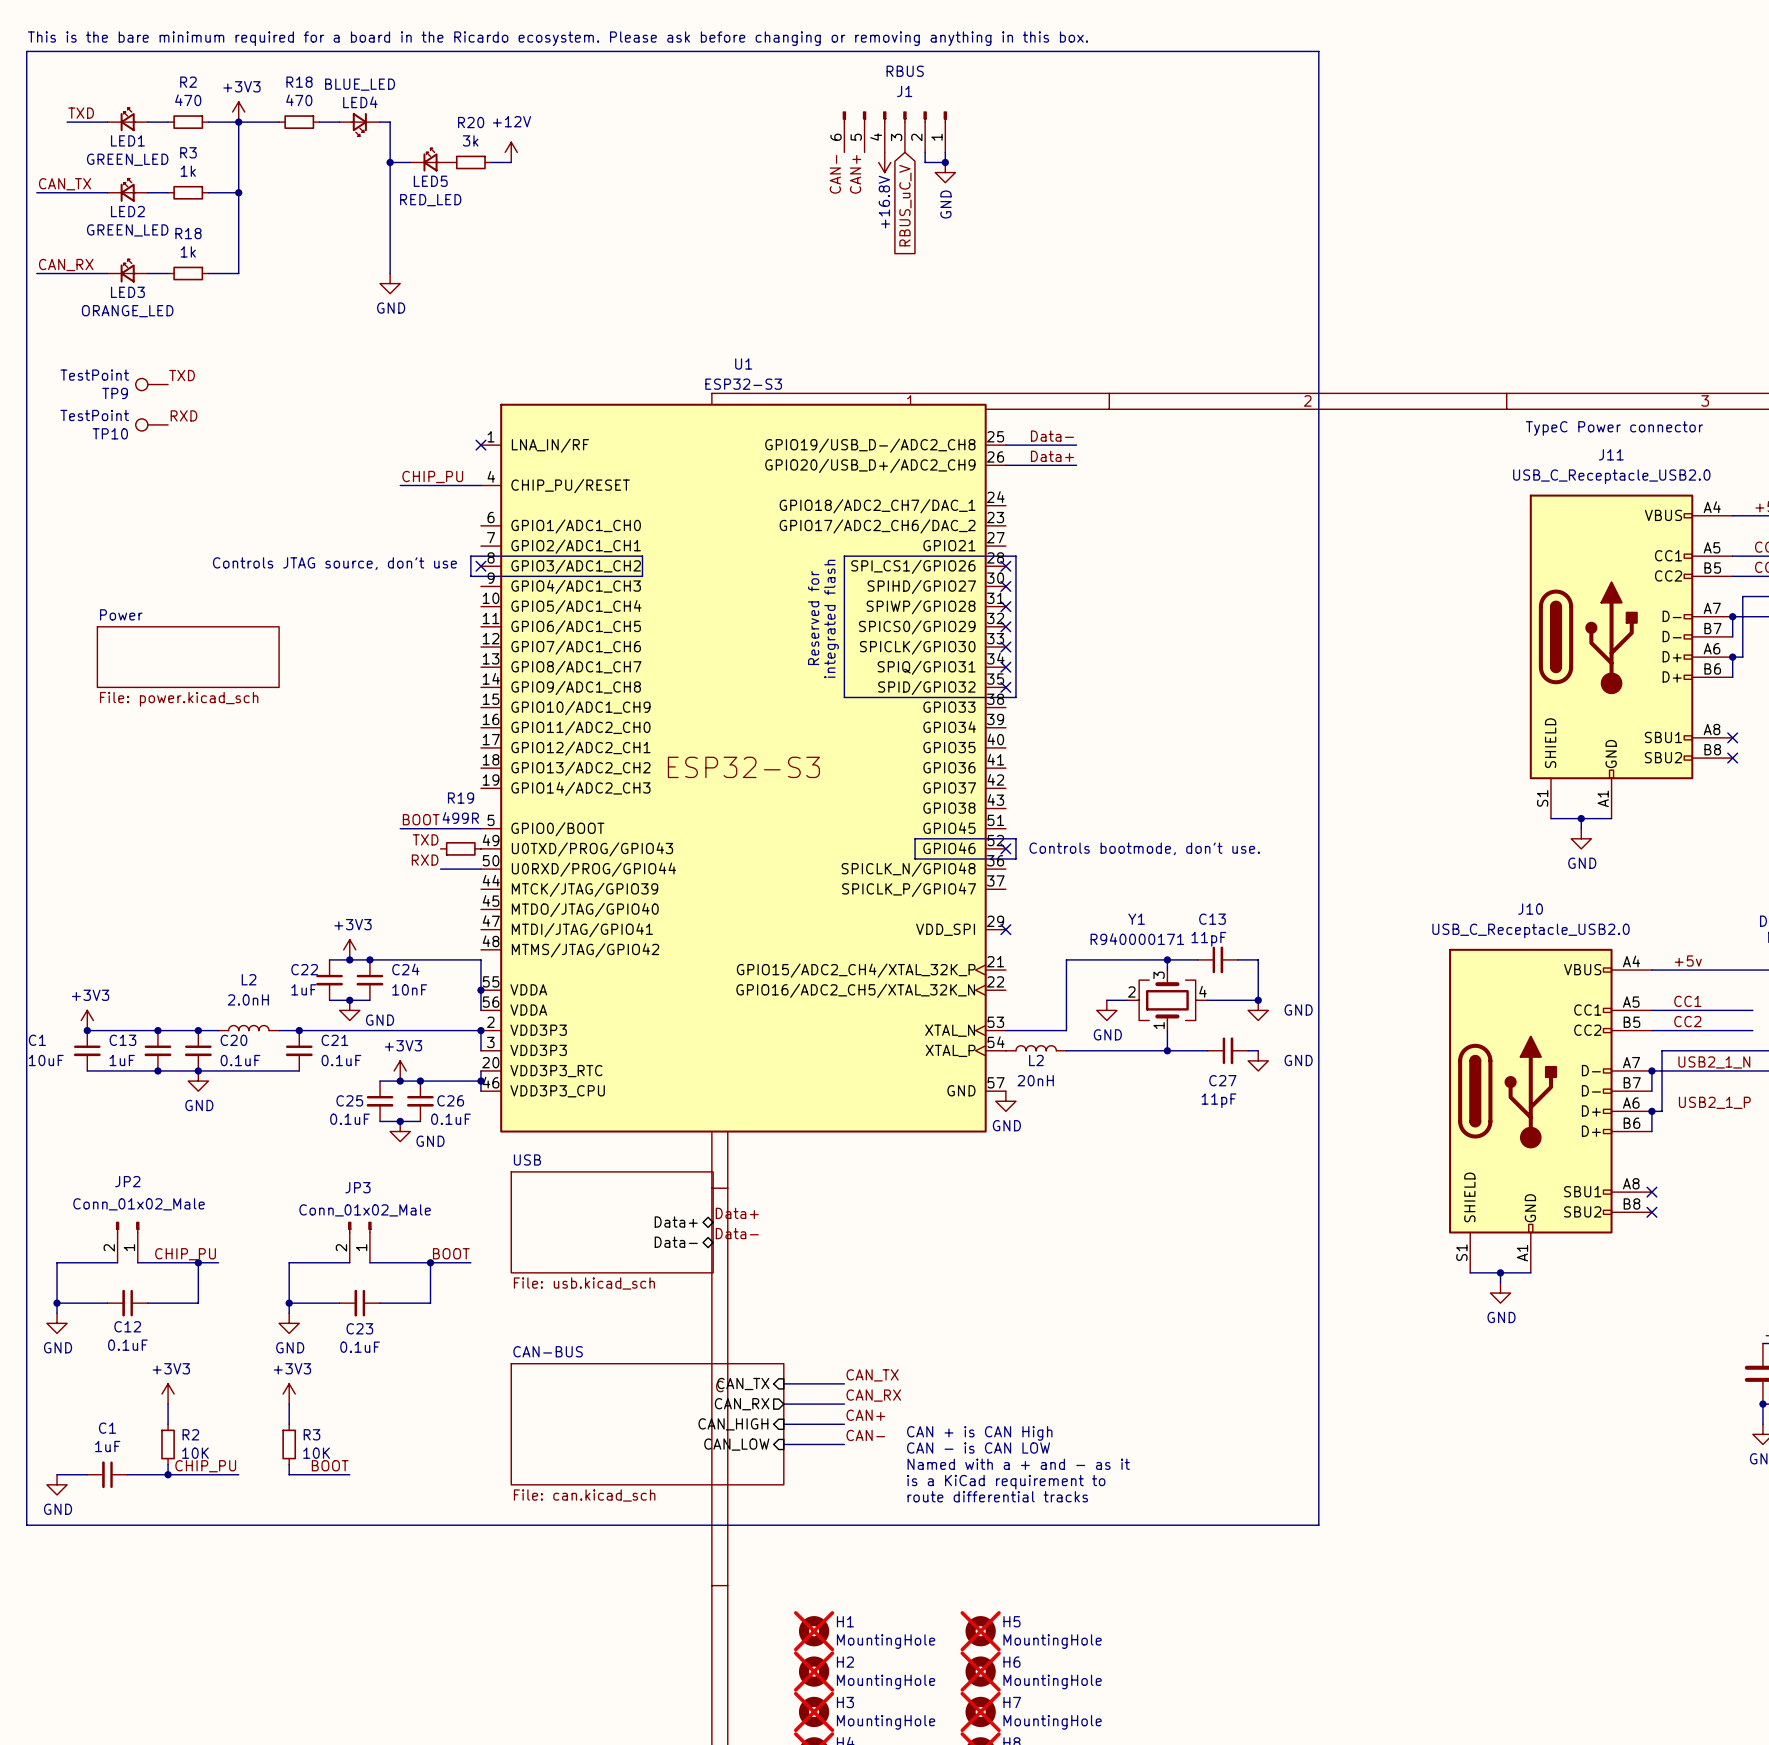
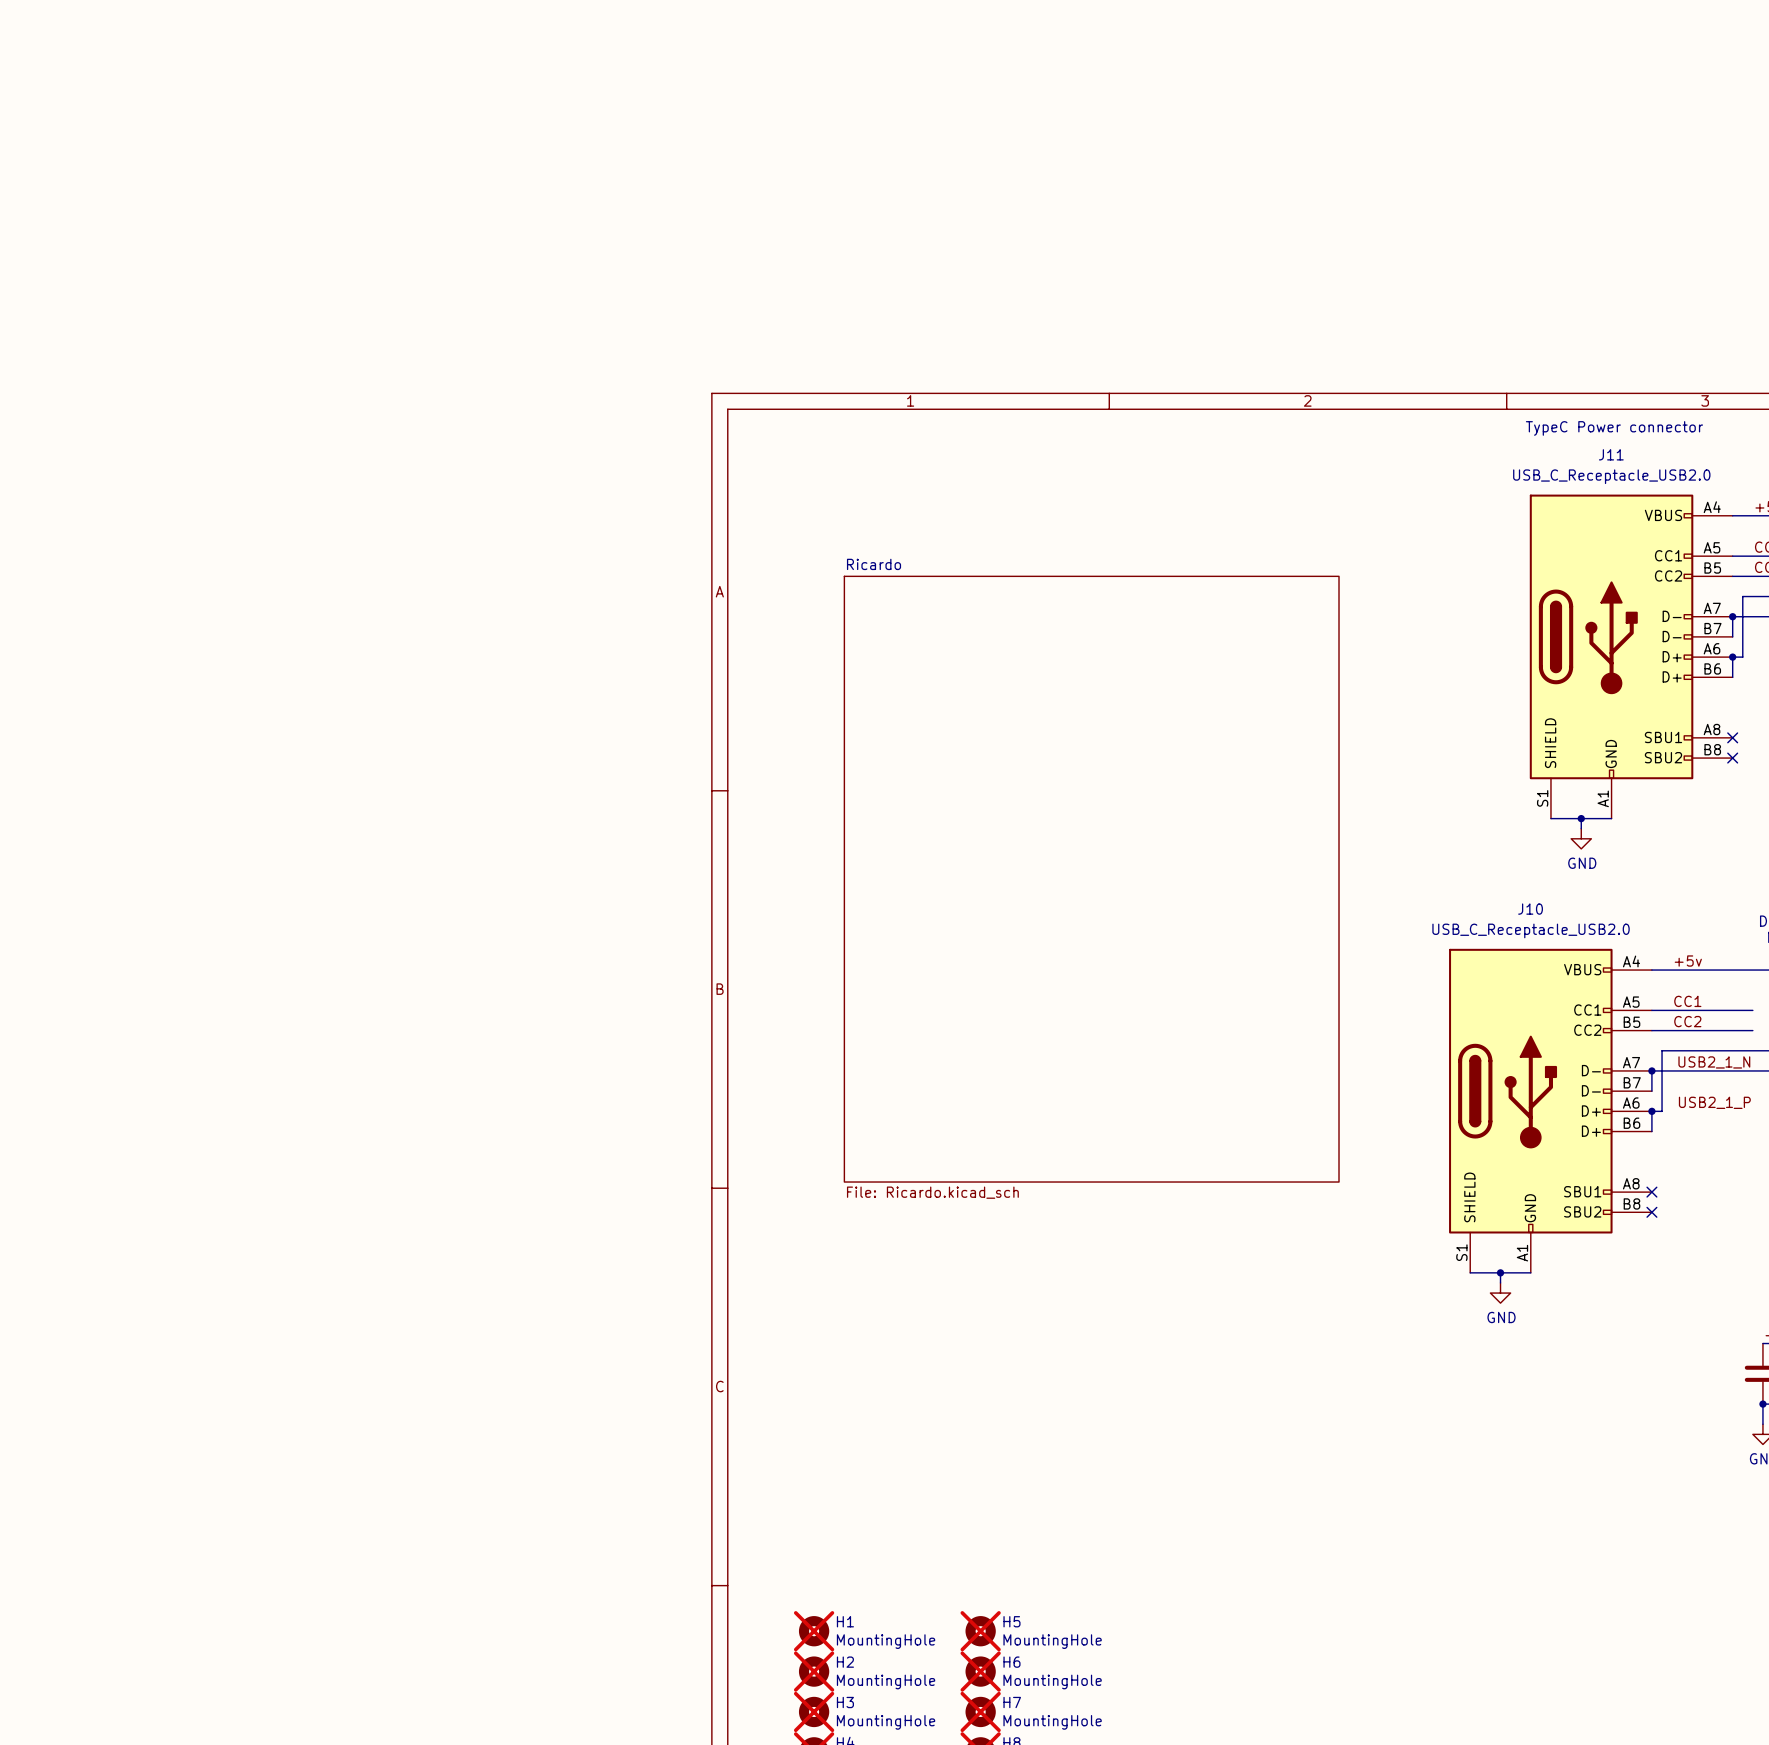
text: This is the bare minimum required for a board in the Ricardo ecosystem. Please ask before changing or removing anything in this box. (557, 38) -> none
line: (26, 51) (1318, 51) (1318, 1525) (26, 1525) (26, 51) -> none
power symbol: +3V3 (238, 112) -> none
label: TXD (81, 113) -> none
LED1: GREEN_LED (127, 119) -> none
wire: (67, 122) (107, 122) -> none
wire: (147, 122) (168, 122) -> none
R2: 470 (188, 122) -> none
wire: (208, 122) (279, 122) -> none
wire: (238, 122) (238, 273) (208, 273) -> none
junction: (238, 122) -> none
R18: 470 (299, 122) -> none
wire: (319, 122) (339, 122) -> none
wire: (380, 122) (390, 122) (390, 273) -> none
LED4: BLUE_LED (359, 124) -> none
J1: RBUS (894, 131) -> none
power symbol: +12V (511, 152) -> none
wire: (925, 152) (925, 162) (945, 162) (945, 152) -> none
LED5: RED_LED (430, 159) -> none
wire: (390, 162) (410, 162) -> none
junction: (390, 162) -> none
R20: 3k (470, 162) -> none
wire: (491, 162) (511, 162) -> none
power symbol: +16.8V (884, 162) -> none
junction: (945, 162) -> none
power symbol: GND (945, 172) -> none
label: CAN- (835, 174) -> none
label: CAN+ (855, 174) -> none
label: CAN_TX (65, 184) -> none
LED2: GREEN_LED (127, 190) -> none
wire: (36, 192) (107, 192) -> none
wire: (147, 192) (168, 192) -> none
R3: 1k (188, 192) -> none
wire: (208, 192) (238, 192) -> none
junction: (238, 192) -> none
global label: RBUS_uC_V (905, 205) -> none
label: CAN_RX (66, 264) -> none
LED3: ORANGE_LED (127, 270) -> none
wire: (36, 273) (107, 273) -> none
wire: (147, 273) (168, 273) -> none
R18: 1k (188, 273) -> none
power symbol: GND (390, 283) -> none
label: TXD (182, 375) -> none
TP9: TestPoint (151, 384) -> none
label: RXD (183, 415) -> none
TP10: TestPoint (151, 424) -> none
label: Data- (1052, 436) -> none
no-connect mark: (480, 445) -> none
wire: (1005, 445) (1076, 445) -> none
label: Data+ (1052, 456) -> none
wire: (1005, 465) (1076, 465) -> none
label: CHIP_PU (432, 476) -> none
wire: (400, 485) (480, 485) -> none
line: (470, 556) (642, 556) (642, 576) (470, 576) (470, 556) -> none
line: (844, 556) (1015, 556) (1015, 697) (844, 697) (844, 556) -> none
text: Controls JTAG source, don't use (334, 563) -> none
no-connect mark: (480, 566) -> none
no-connect mark: (1005, 566) -> none
no-connect mark: (1005, 586) -> none
no-connect mark: (1005, 606) -> none
text: Reserved for (813, 618) -> none
text: integrated flash (831, 619) -> none
no-connect mark: (1005, 626) -> none
no-connect mark: (1005, 647) -> none
sheet Power: File: power.kicad_sch (188, 657) -> none
no-connect mark: (1005, 667) -> none
no-connect mark: (1005, 687) -> none
U1: ESP32-S3 (743, 768) -> none
label: BOOT (421, 819) -> none
wire: (400, 828) (480, 828) -> none
line: (915, 838) (915, 858) (1015, 858) (1015, 838) (915, 838) -> none
label: TXD (425, 839) -> none
R19: 499R (460, 848) -> none
no-connect mark: (1005, 848) -> none
text: Controls bootmode, don't use. (1144, 848) -> none
label: RXD (425, 860) -> none
wire: (440, 869) (480, 869) -> none
sheet Ricardo: none -> File: Ricardo.kicad_sch (1091, 879)
no-connect mark: (1005, 929) -> none
power symbol: +3V3 (349, 949) -> none
wire: (329, 959) (480, 959) (480, 1010) -> none
junction: (349, 959) -> none
junction: (369, 959) -> none
wire: (1167, 959) (1167, 970) -> none
junction: (1167, 959) -> none
wire: (1197, 959) (1066, 959) (1066, 1030) (1005, 1030) -> none
C13: 11pF (1217, 959) -> none
wire: (1238, 959) (1258, 959) (1258, 1000) (1207, 1000) -> none
C22: 1uF (329, 980) -> none
C24: 10nF (369, 980) -> none
junction: (480, 990) -> none
wire: (329, 1000) (369, 1000) -> none
junction: (349, 1000) -> none
wire: (1106, 1000) (1127, 1000) -> none
Y1: R940000171 (1167, 1000) -> none
junction: (1258, 1000) -> none
power symbol: GND (349, 1010) -> none
power symbol: GND (1106, 1010) -> none
power symbol: GND (1258, 1010) -> none
power symbol: +3V3 (87, 1020) -> none
L2: 2.0nH (248, 1028) -> none
wire: (87, 1030) (218, 1030) -> none
junction: (87, 1030) -> none
junction: (157, 1030) -> none
junction: (198, 1030) -> none
wire: (279, 1030) (480, 1030) (480, 1050) -> none
junction: (299, 1030) -> none
junction: (480, 1030) -> none
wire: (1167, 1030) (1167, 1050) -> none
L2: 20nH (1036, 1048) -> none
C1: 10uF (87, 1050) -> none
C13: 1uF (157, 1050) -> none
C20: 0.1uF (198, 1050) -> none
C21: 0.1uF (299, 1050) -> none
wire: (1066, 1050) (1207, 1050) -> none
junction: (1167, 1050) -> none
C27: 11pF (1227, 1050) -> none
wire: (1248, 1050) (1258, 1050) -> none
power symbol: GND (1258, 1060) -> none
wire: (87, 1070) (299, 1070) -> none
junction: (157, 1070) -> none
junction: (198, 1070) -> none
power symbol: +3V3 (400, 1070) -> none
wire: (480, 1070) (480, 1091) -> none
power symbol: GND (198, 1081) -> none
wire: (380, 1081) (480, 1081) -> none
junction: (400, 1081) -> none
junction: (420, 1081) -> none
junction: (480, 1081) -> none
C25: 0.1uF (380, 1101) -> none
C26: 0.1uF (420, 1101) -> none
power symbol: GND (1005, 1101) -> none
wire: (380, 1121) (420, 1121) -> none
junction: (400, 1121) -> none
power symbol: GND (400, 1131) -> none
label: Data+ (737, 1213) -> none
sheet USB: File: usb.kicad_sch (612, 1222) -> none
sheet pin: Data+ (676, 1222) -> none
label: Data- (737, 1233) -> none
JP2: Conn_01x02_Male (127, 1242) -> none
JP3: Conn_01x02_Male (359, 1242) -> none
sheet pin: Data- (676, 1242) -> none
label: BOOT (451, 1253) -> none
label: CHIP_PU (185, 1254) -> none
wire: (117, 1262) (57, 1262) (57, 1313) -> none
wire: (137, 1262) (218, 1262) -> none
wire: (198, 1262) (198, 1303) (147, 1303) -> none
junction: (198, 1262) -> none
wire: (349, 1262) (289, 1262) (289, 1313) -> none
wire: (369, 1262) (470, 1262) -> none
wire: (430, 1262) (430, 1303) (380, 1303) -> none
junction: (430, 1262) -> none
wire: (57, 1303) (107, 1303) -> none
junction: (57, 1303) -> none
C12: 0.1uF (127, 1303) -> none
wire: (289, 1303) (339, 1303) -> none
junction: (289, 1303) -> none
C23: 0.1uF (359, 1303) -> none
power symbol: GND (57, 1323) -> none
power symbol: GND (289, 1323) -> none
label: CAN_TX (872, 1375) -> none
wire: (783, 1383) (844, 1383) -> none
sheet pin: CAN_TX (743, 1384) -> none
power symbol: +3V3 (168, 1393) -> none
power symbol: +3V3 (289, 1393) -> none
label: CAN_RX (873, 1395) -> none
wire: (168, 1404) (168, 1424) -> none
wire: (289, 1404) (289, 1424) -> none
sheet pin: CAN_RX (742, 1404) -> none
wire: (783, 1404) (844, 1404) -> none
label: CAN+ (865, 1415) -> none
sheet CAN-BUS: File: can.kicad_sch (647, 1424) -> none
sheet pin: CAN_HIGH (733, 1424) -> none
wire: (783, 1424) (844, 1424) -> none
text: CAN + is CAN High (979, 1433) -> none
label: CAN- (865, 1435) -> none
R2: 10K (168, 1444) -> none
R3: 10K (289, 1444) -> none
sheet pin: CAN_LOW (736, 1444) -> none
wire: (783, 1444) (844, 1444) -> none
text: CAN - is CAN LOW (978, 1448) -> none
wire: (168, 1464) (168, 1474) -> none
wire: (289, 1464) (289, 1474) (349, 1474) -> none
text: Named with a + and - as it (1018, 1464) -> none
label: BOOT (330, 1465) -> none
label: CHIP_PU (205, 1466) -> none
wire: (57, 1474) (87, 1474) -> none
C1: 1uF (107, 1474) -> none
wire: (127, 1474) (238, 1474) -> none
junction: (168, 1474) -> none
text: is a KiCad requirement to (1006, 1482) -> none
power symbol: GND (57, 1484) -> none
text: route differential tracks (997, 1496) -> none

